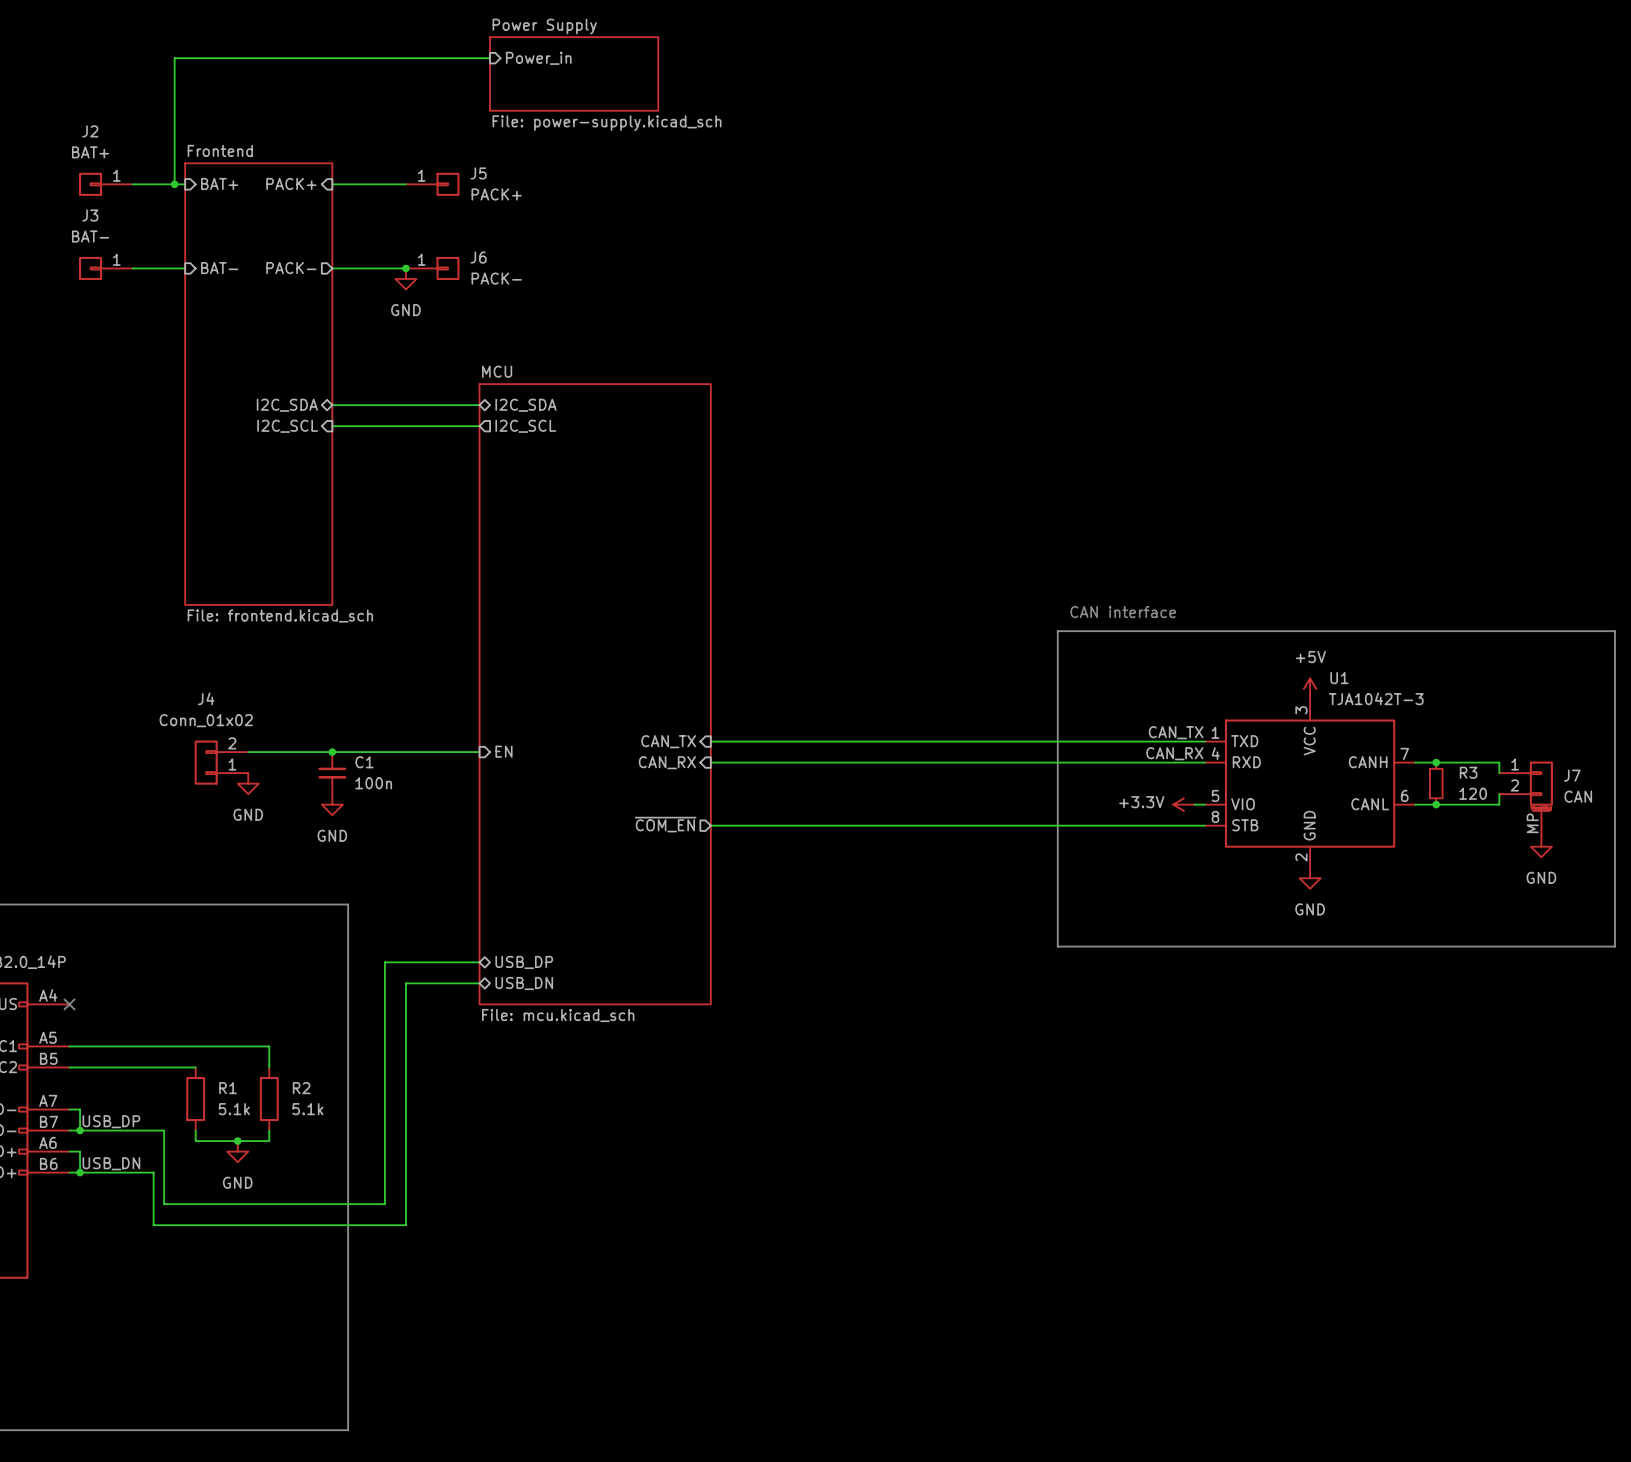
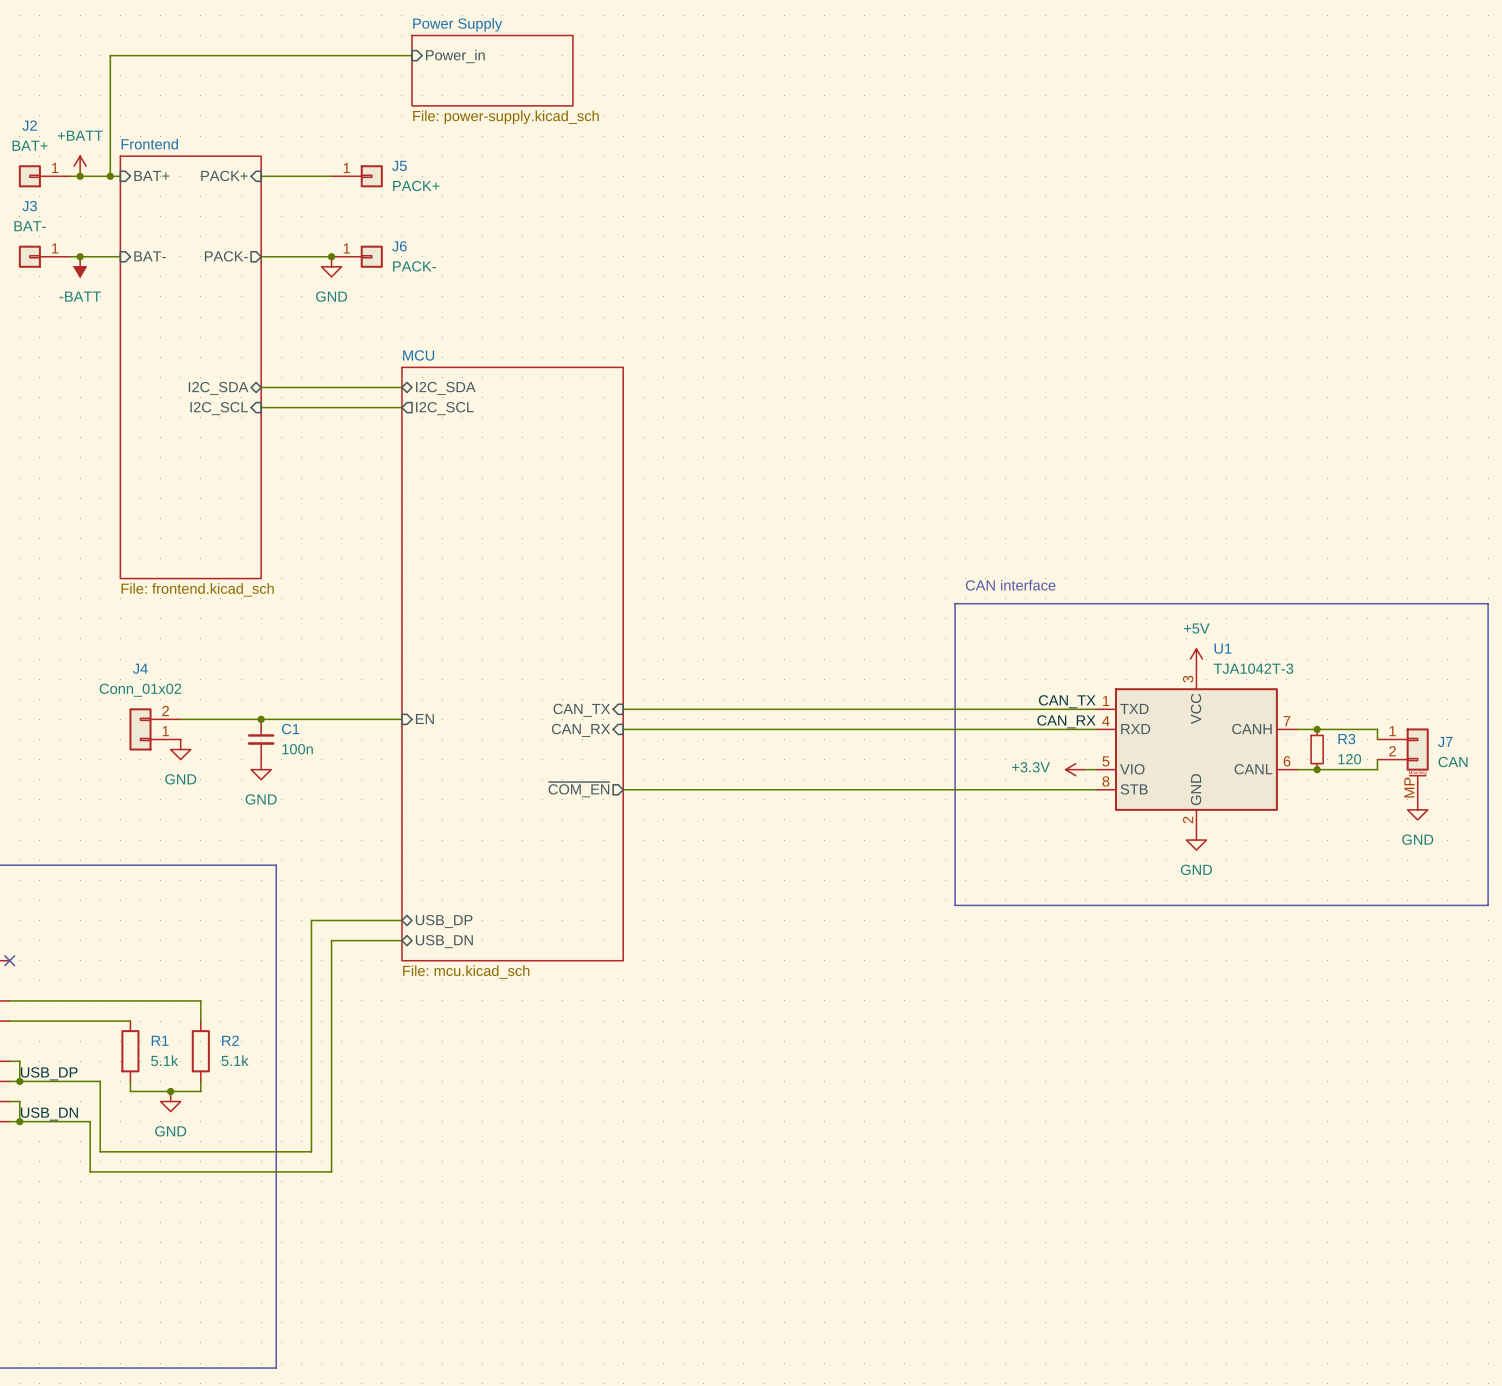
power symbol: none -> +BATT (80, 166)
junction: none -> (80, 176)
junction: none -> (80, 256)
power symbol: none -> -BATT (80, 266)

